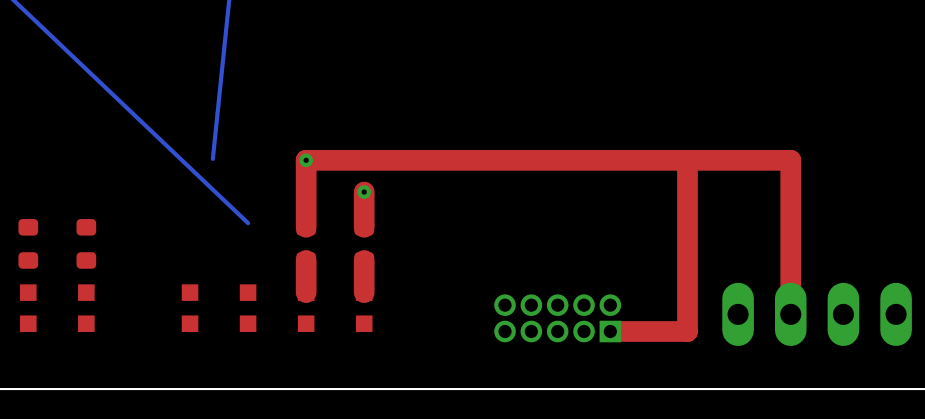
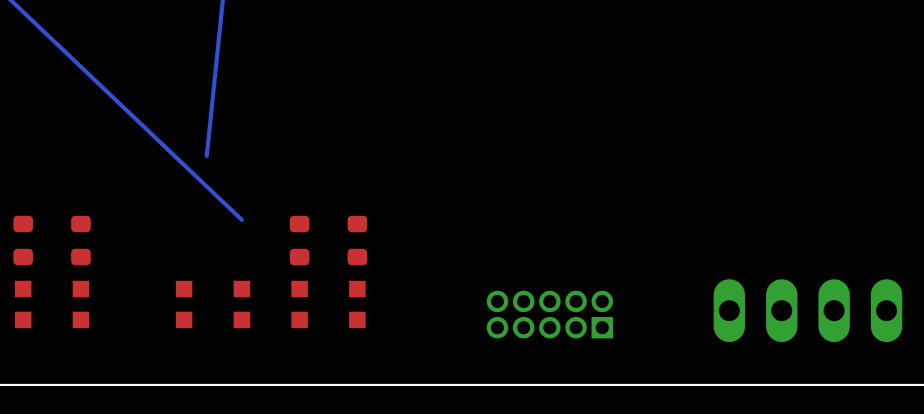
via: (306, 160) -> none
top track: (687, 160) (687, 331) (610, 331) -> none
top track: (364, 192) (364, 227) -> none
via: (364, 192) -> none
top track: (306, 227) (306, 160) (790, 160) (790, 314) -> none
top track: (306, 260) (306, 292) -> none
top track: (364, 260) (364, 292) -> none

